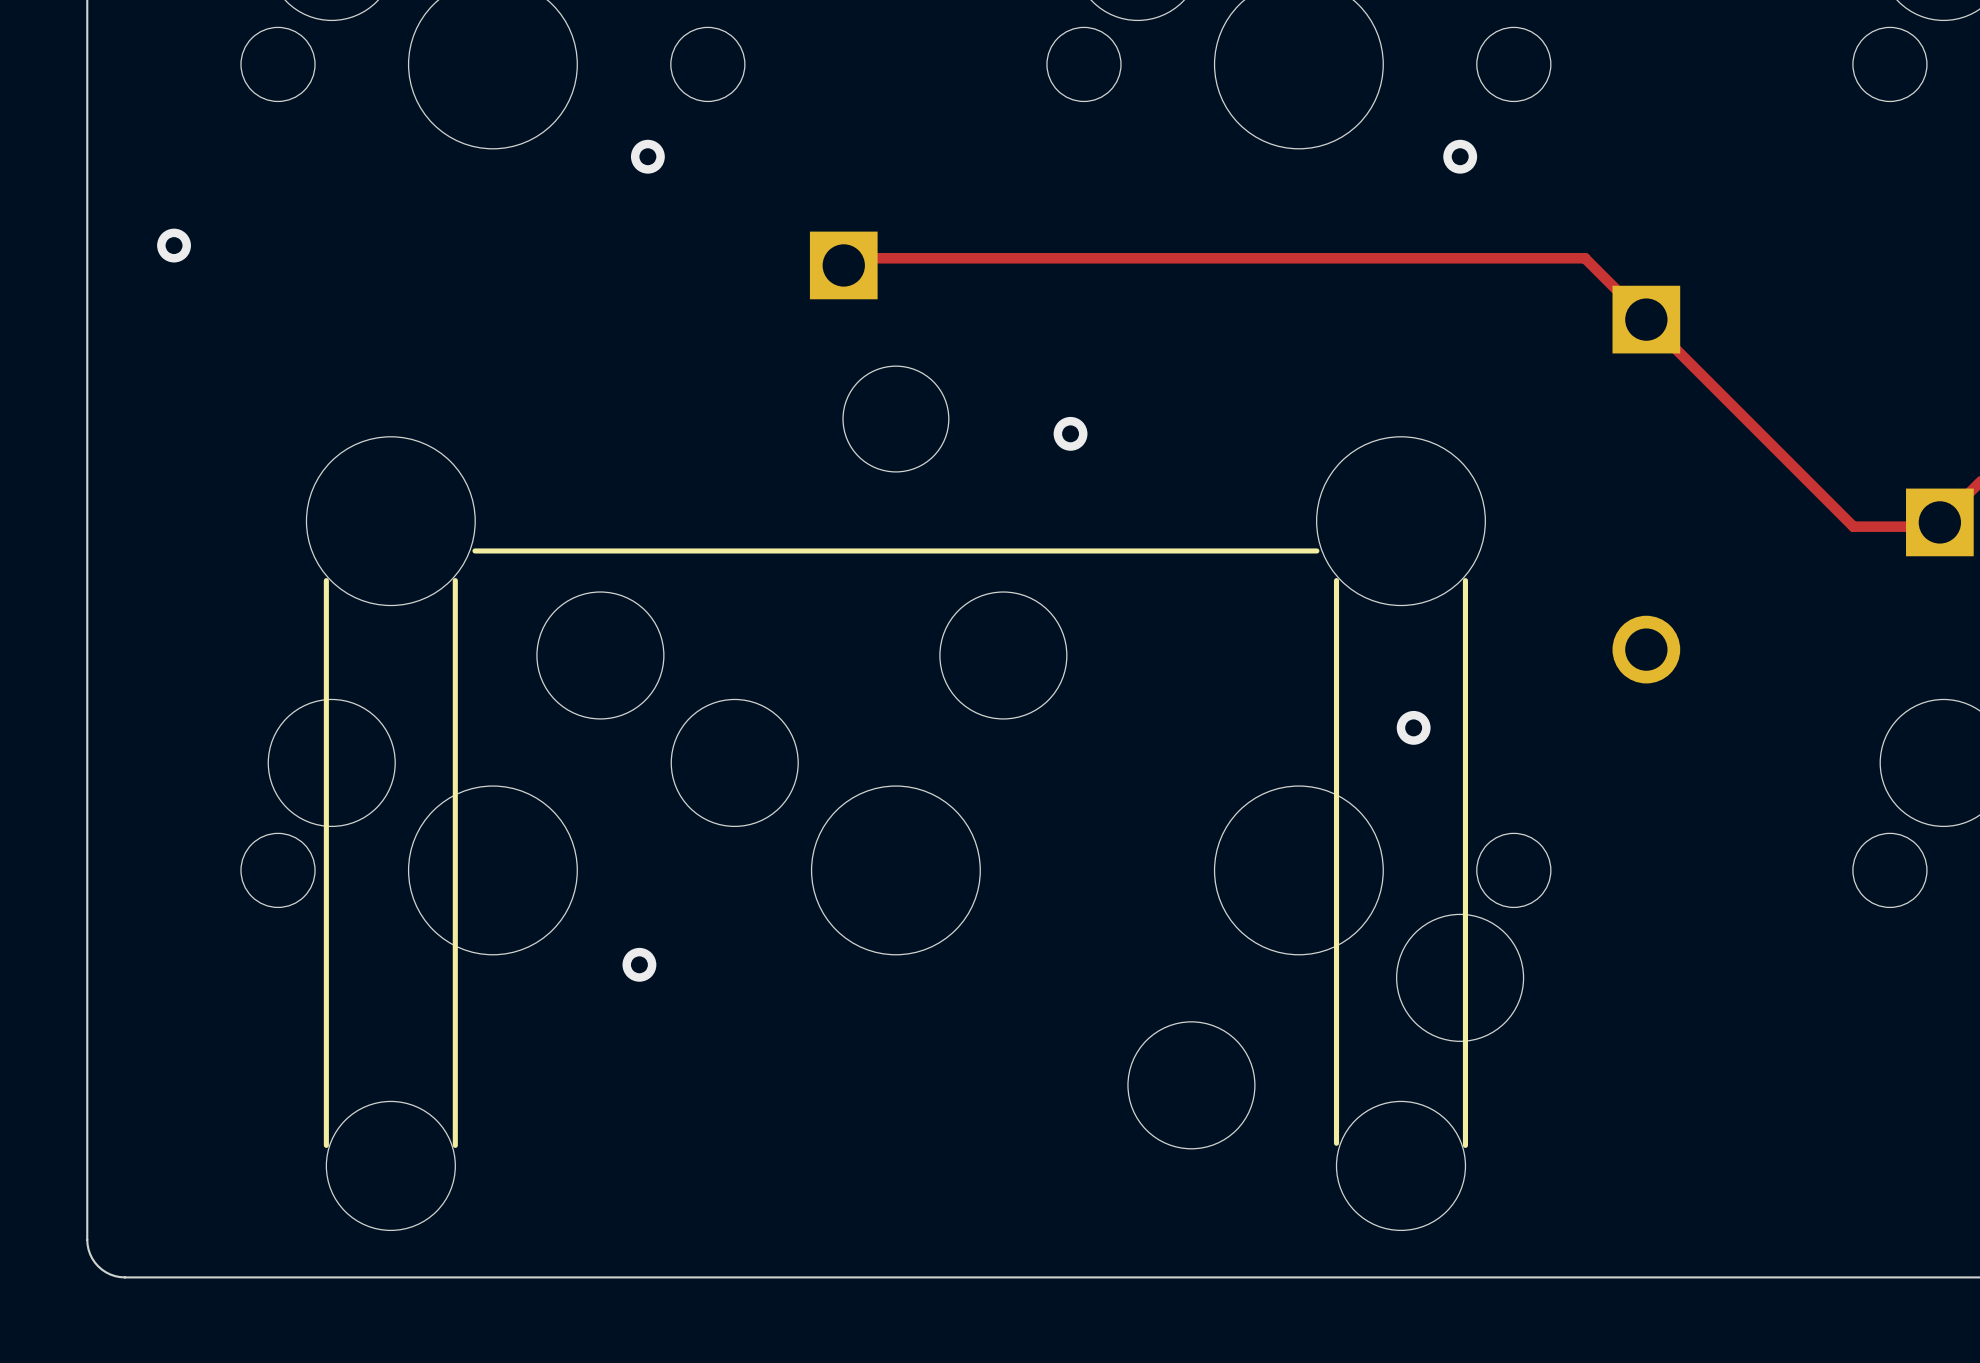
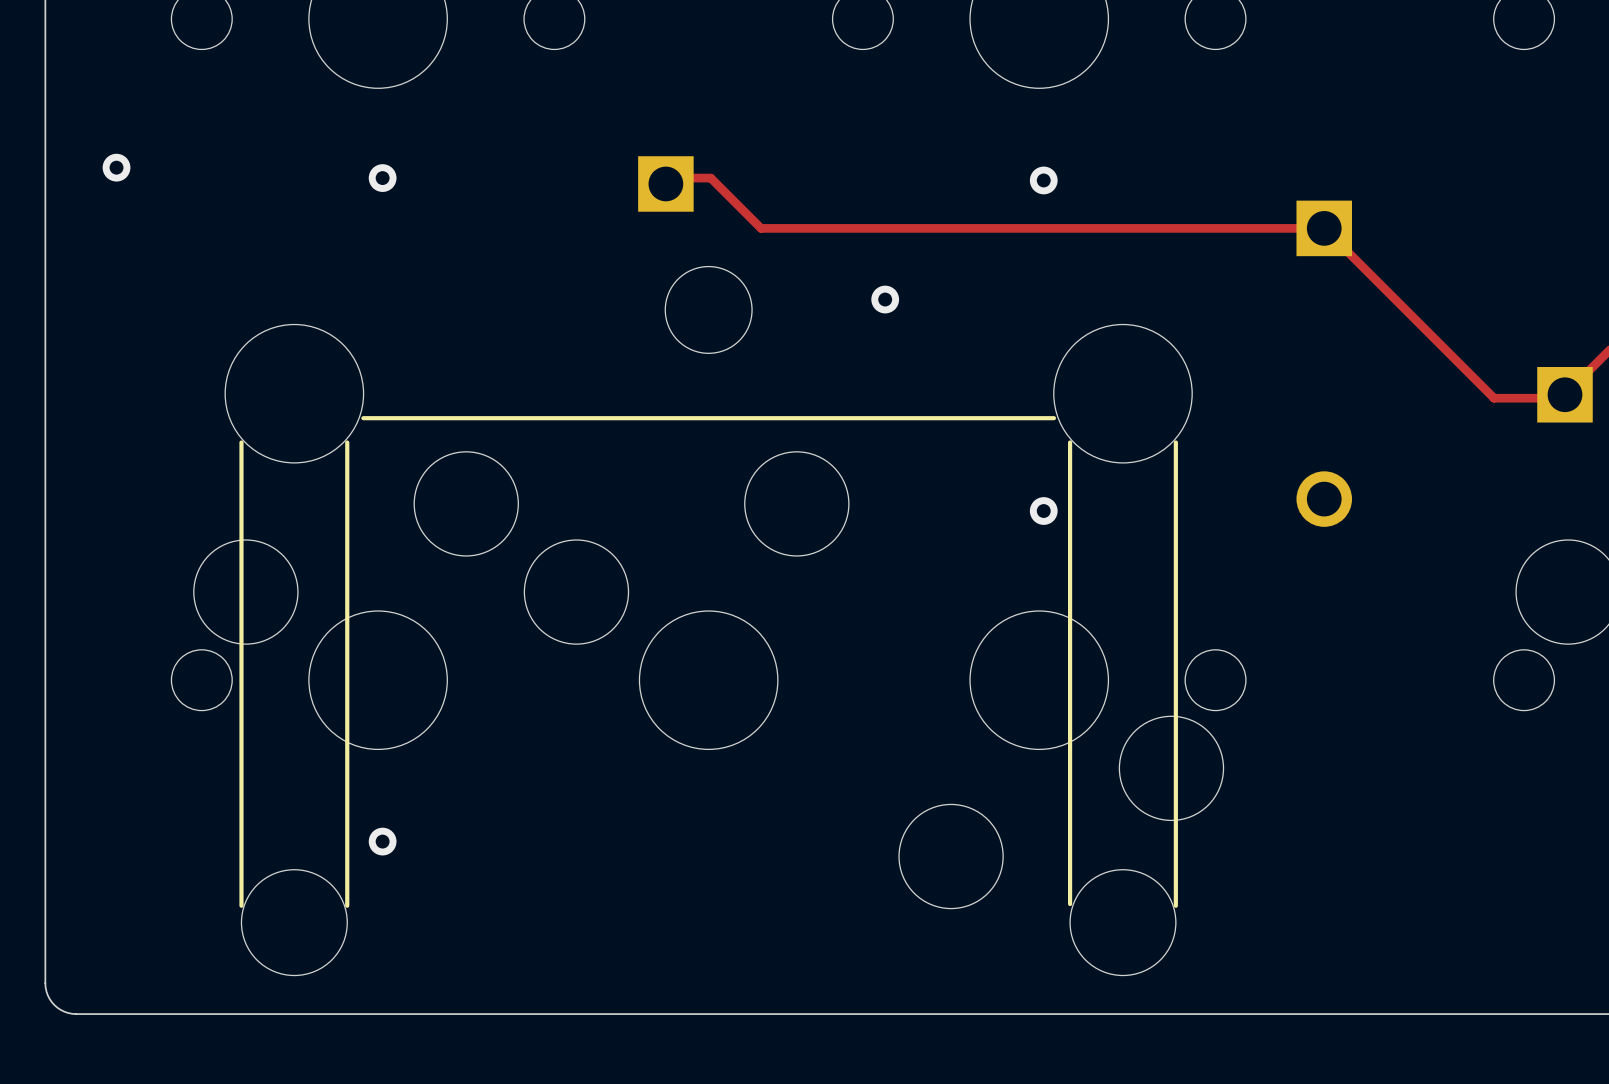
via position: (647, 156) -> (382, 178)
via: (1460, 156) -> none
track: (898, 258) (1585, 258) (1646, 319) -> (710, 178) (761, 228) (1324, 228)
via: none -> (1043, 180)
via position: (1070, 433) -> (885, 299)
via position: (1413, 727) -> (1043, 511)
via position: (639, 964) -> (382, 841)

